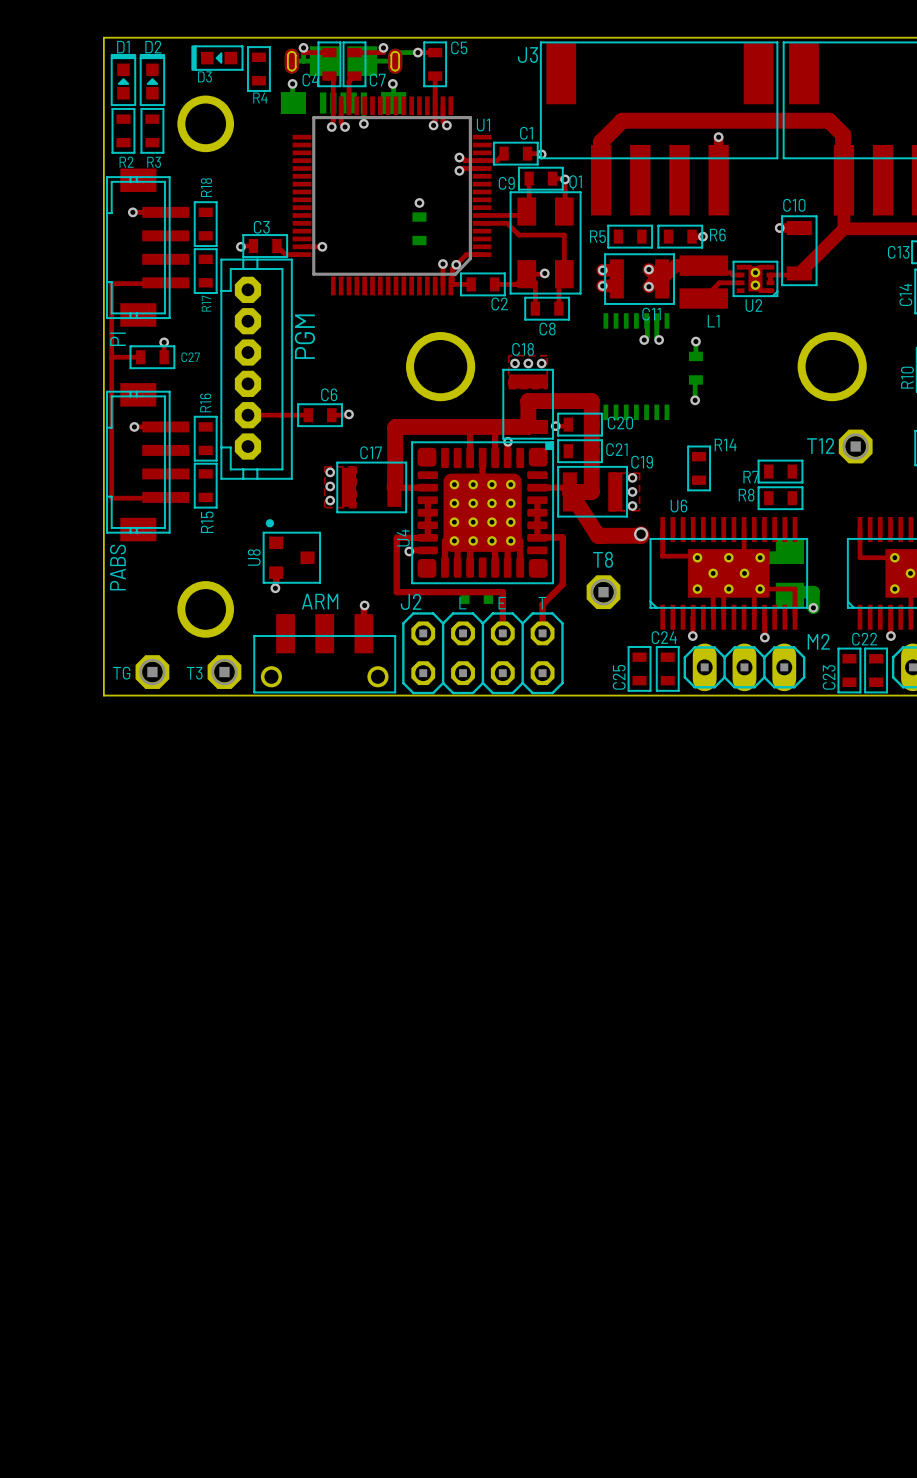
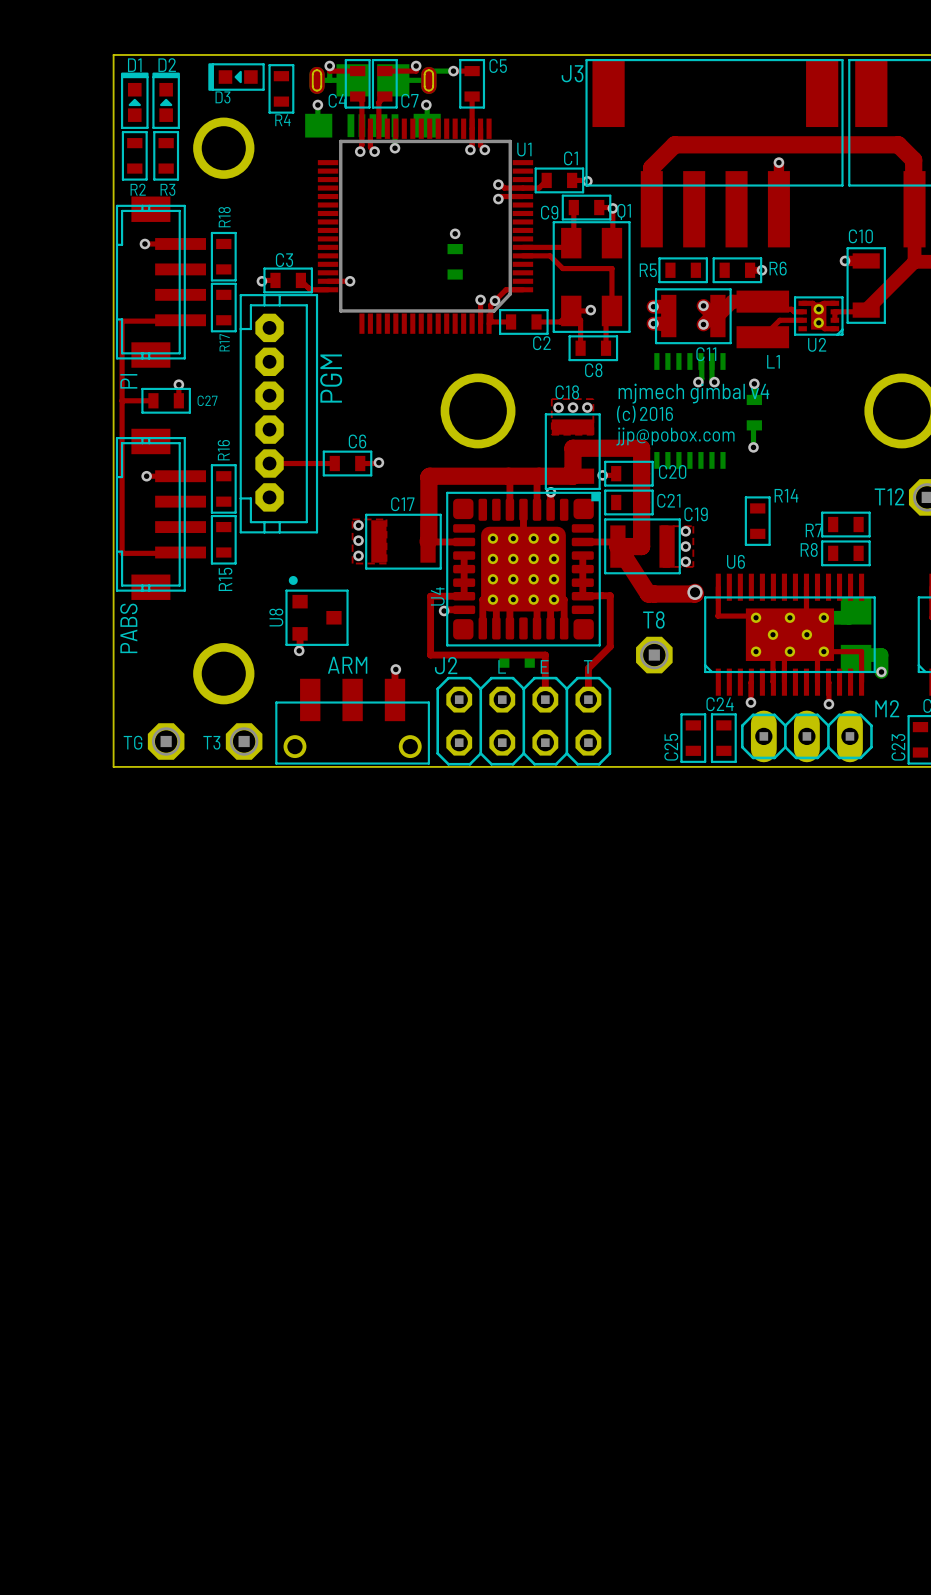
text: none -> mjmech gimbal v4 (693, 393)
text: none -> (c) 2016 (644, 414)
text: none -> jjp@pobox.com (675, 436)

